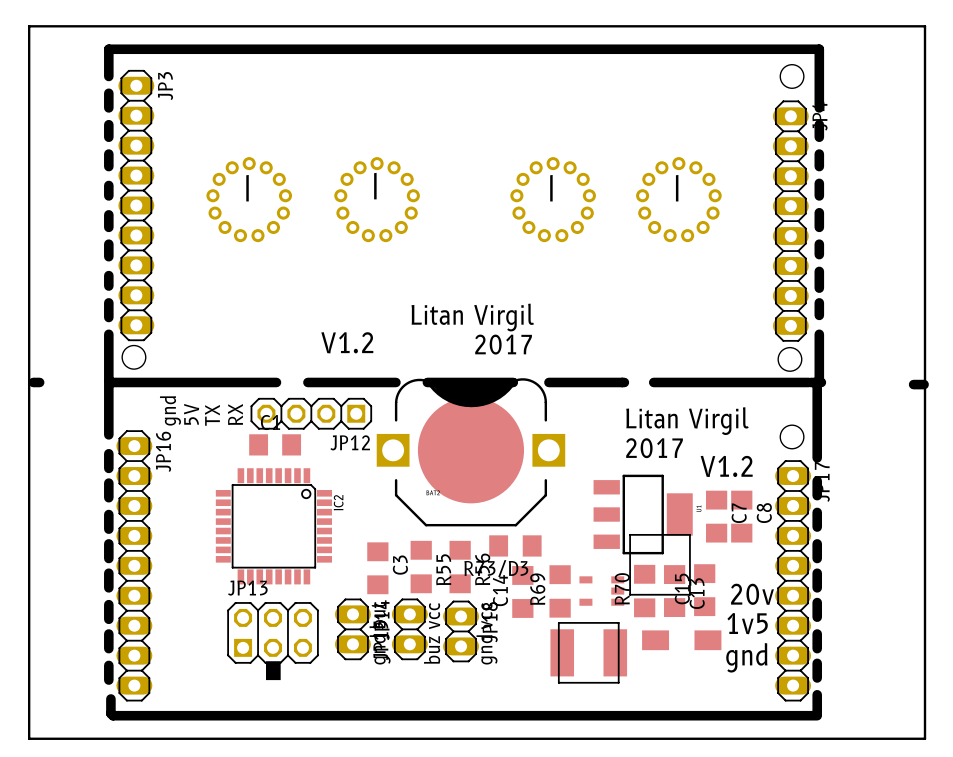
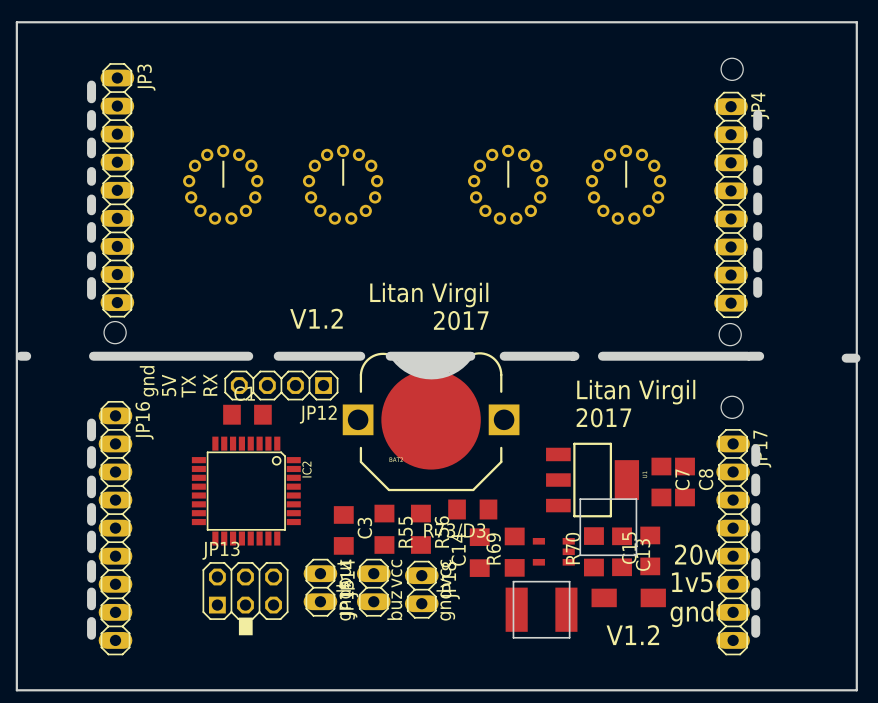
board edge: (108, 76) (108, 49) (819, 49) (819, 107) -> none
board edge: (108, 334) (108, 380) -> none
board edge: (819, 334) (819, 382) -> none
board edge: (108, 382) (108, 434) -> none
board edge: (817, 382) (817, 457) -> none
text position: V1.2 (726, 466) -> V1.2 (632, 635)
board edge: (817, 694) (817, 713) -> none
board edge: (110, 698) (110, 713) (113, 715) (817, 715) -> none

